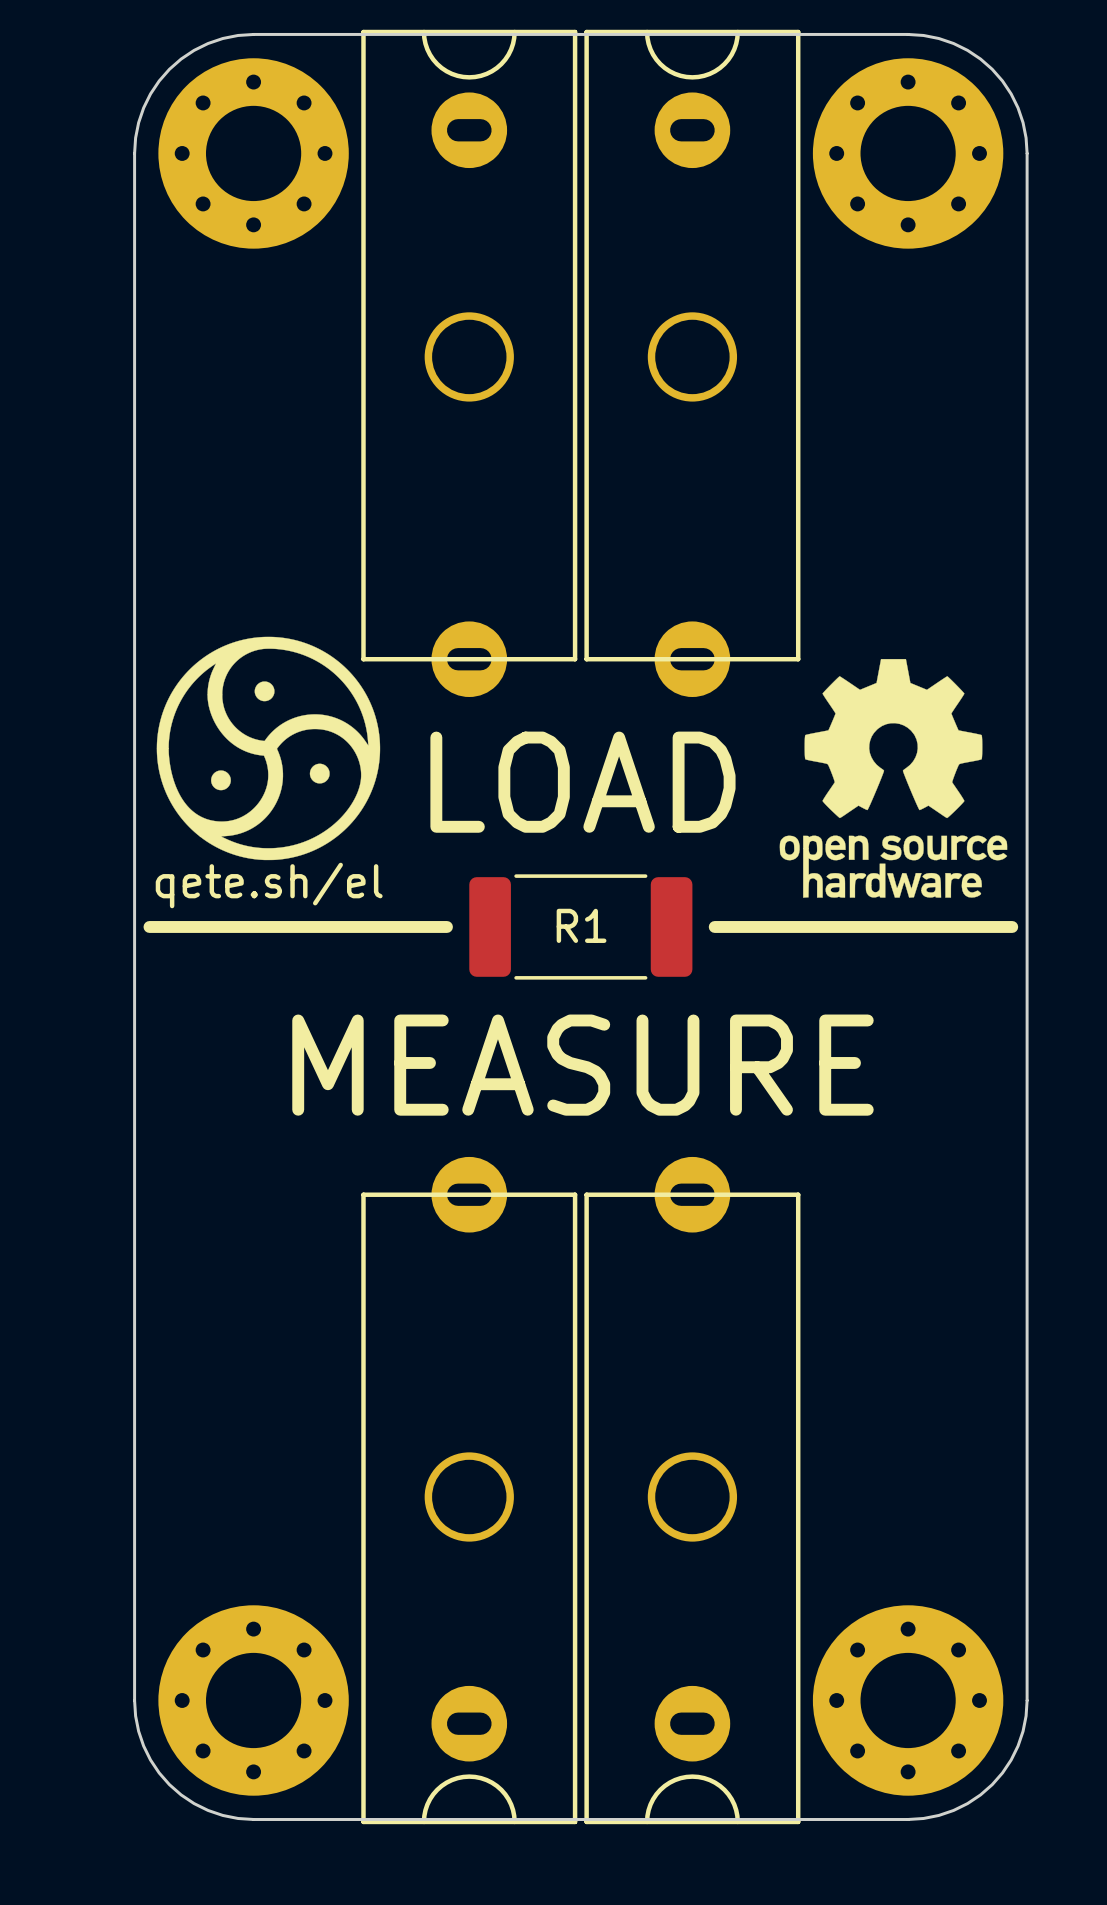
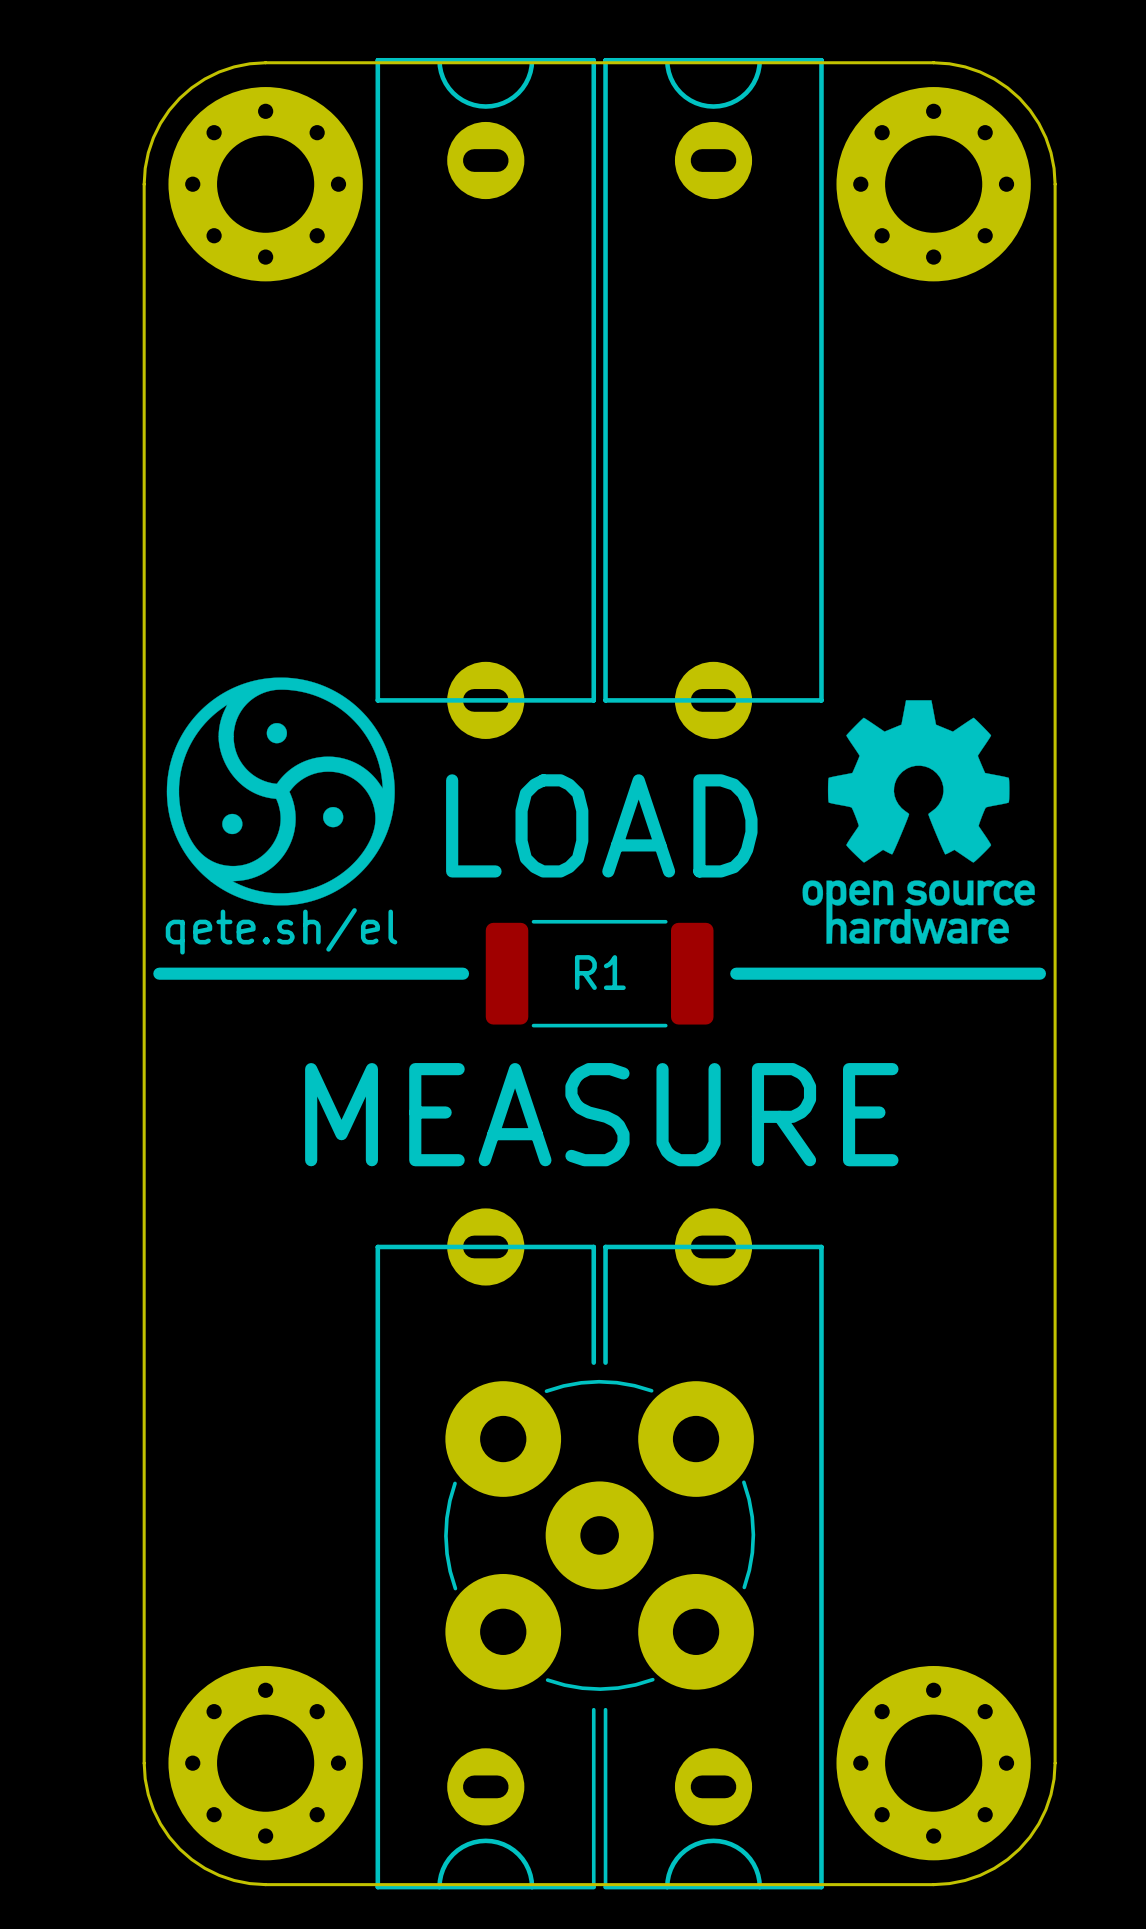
part footprint: [361, 29, 578, 698] -> [375, 57, 597, 739]
part footprint: [584, 29, 801, 698] -> [603, 57, 824, 739]
part footprint: [361, 1156, 578, 1825] -> [375, 1208, 597, 1890]
part footprint: [584, 1156, 801, 1825] -> [603, 1208, 824, 1890]
part: none -> (599, 1535)

